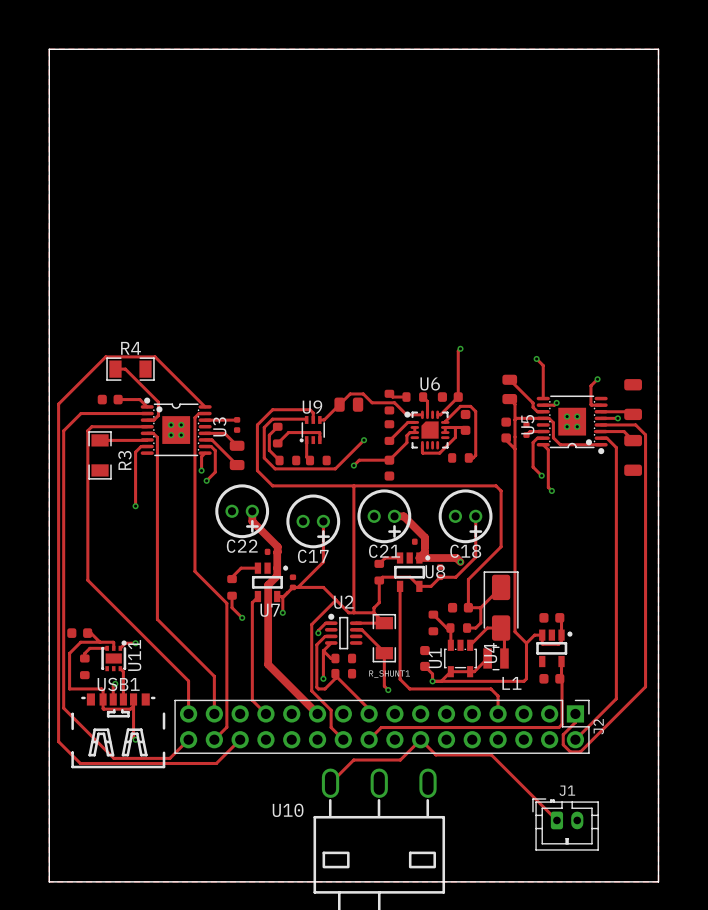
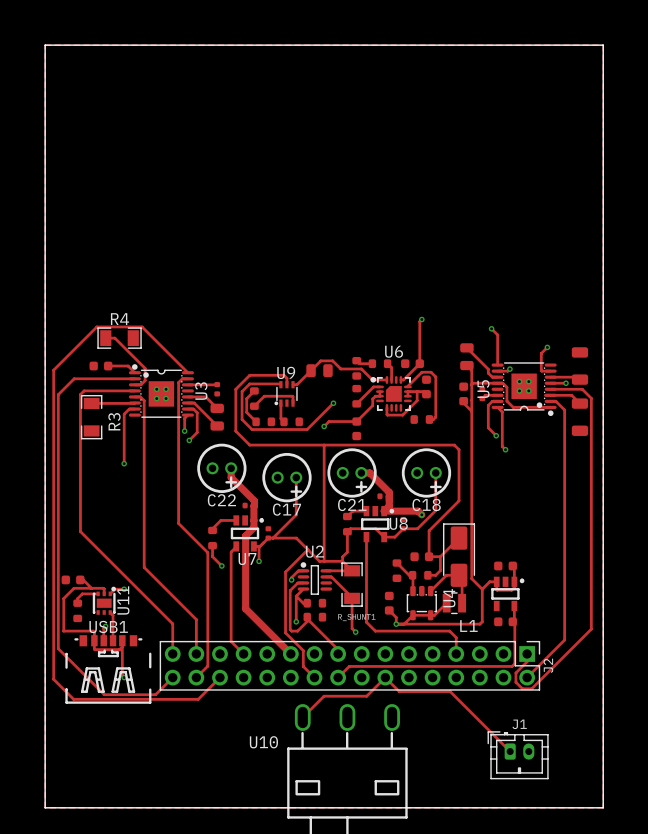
U1: (460, 658) -> none
part: none -> (421, 603)

